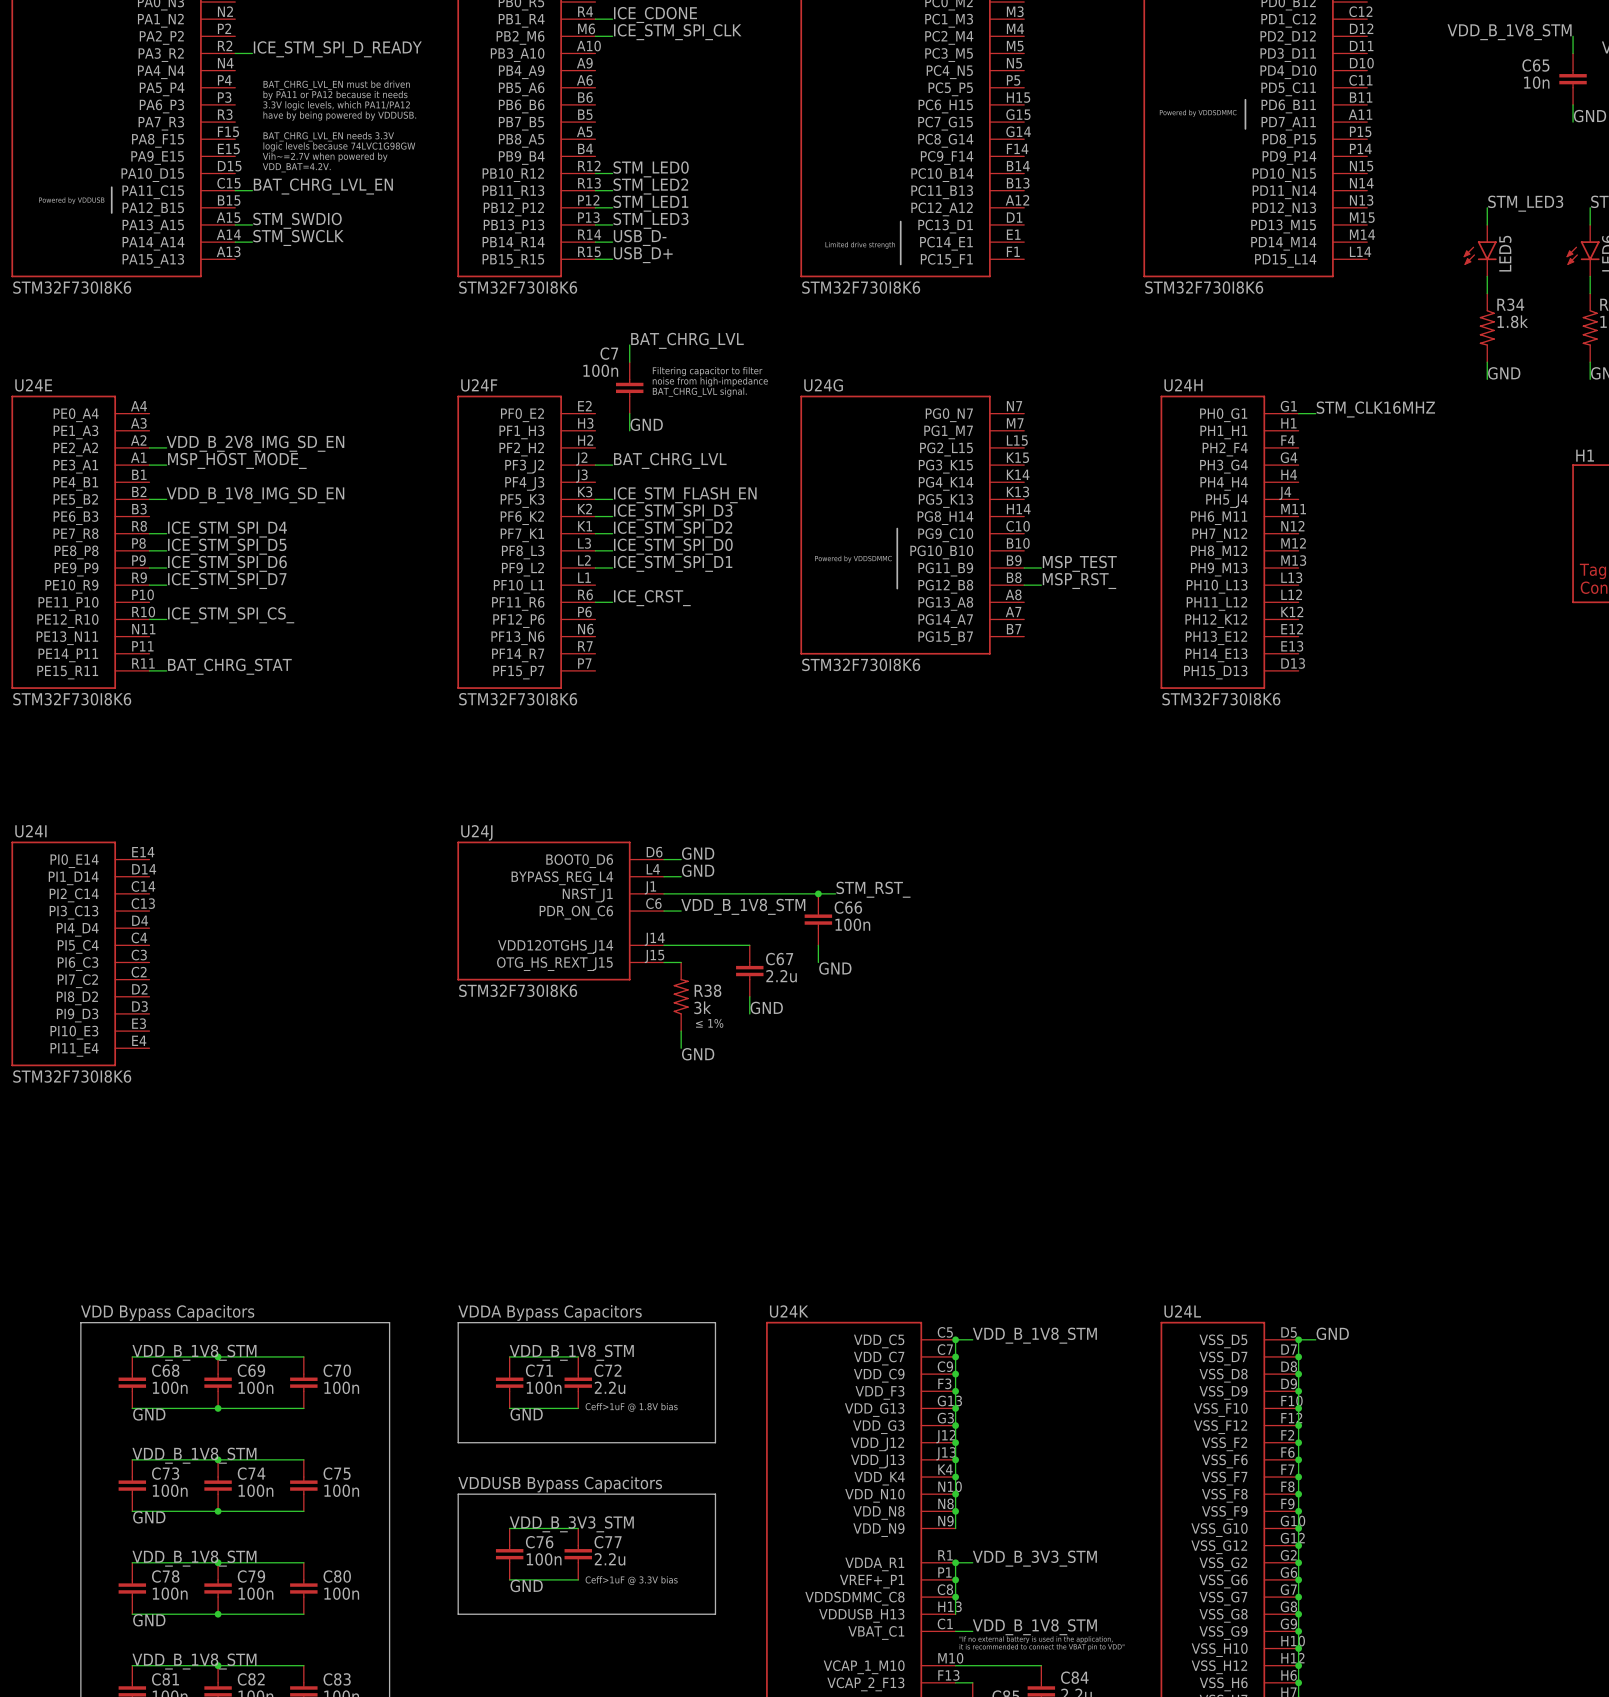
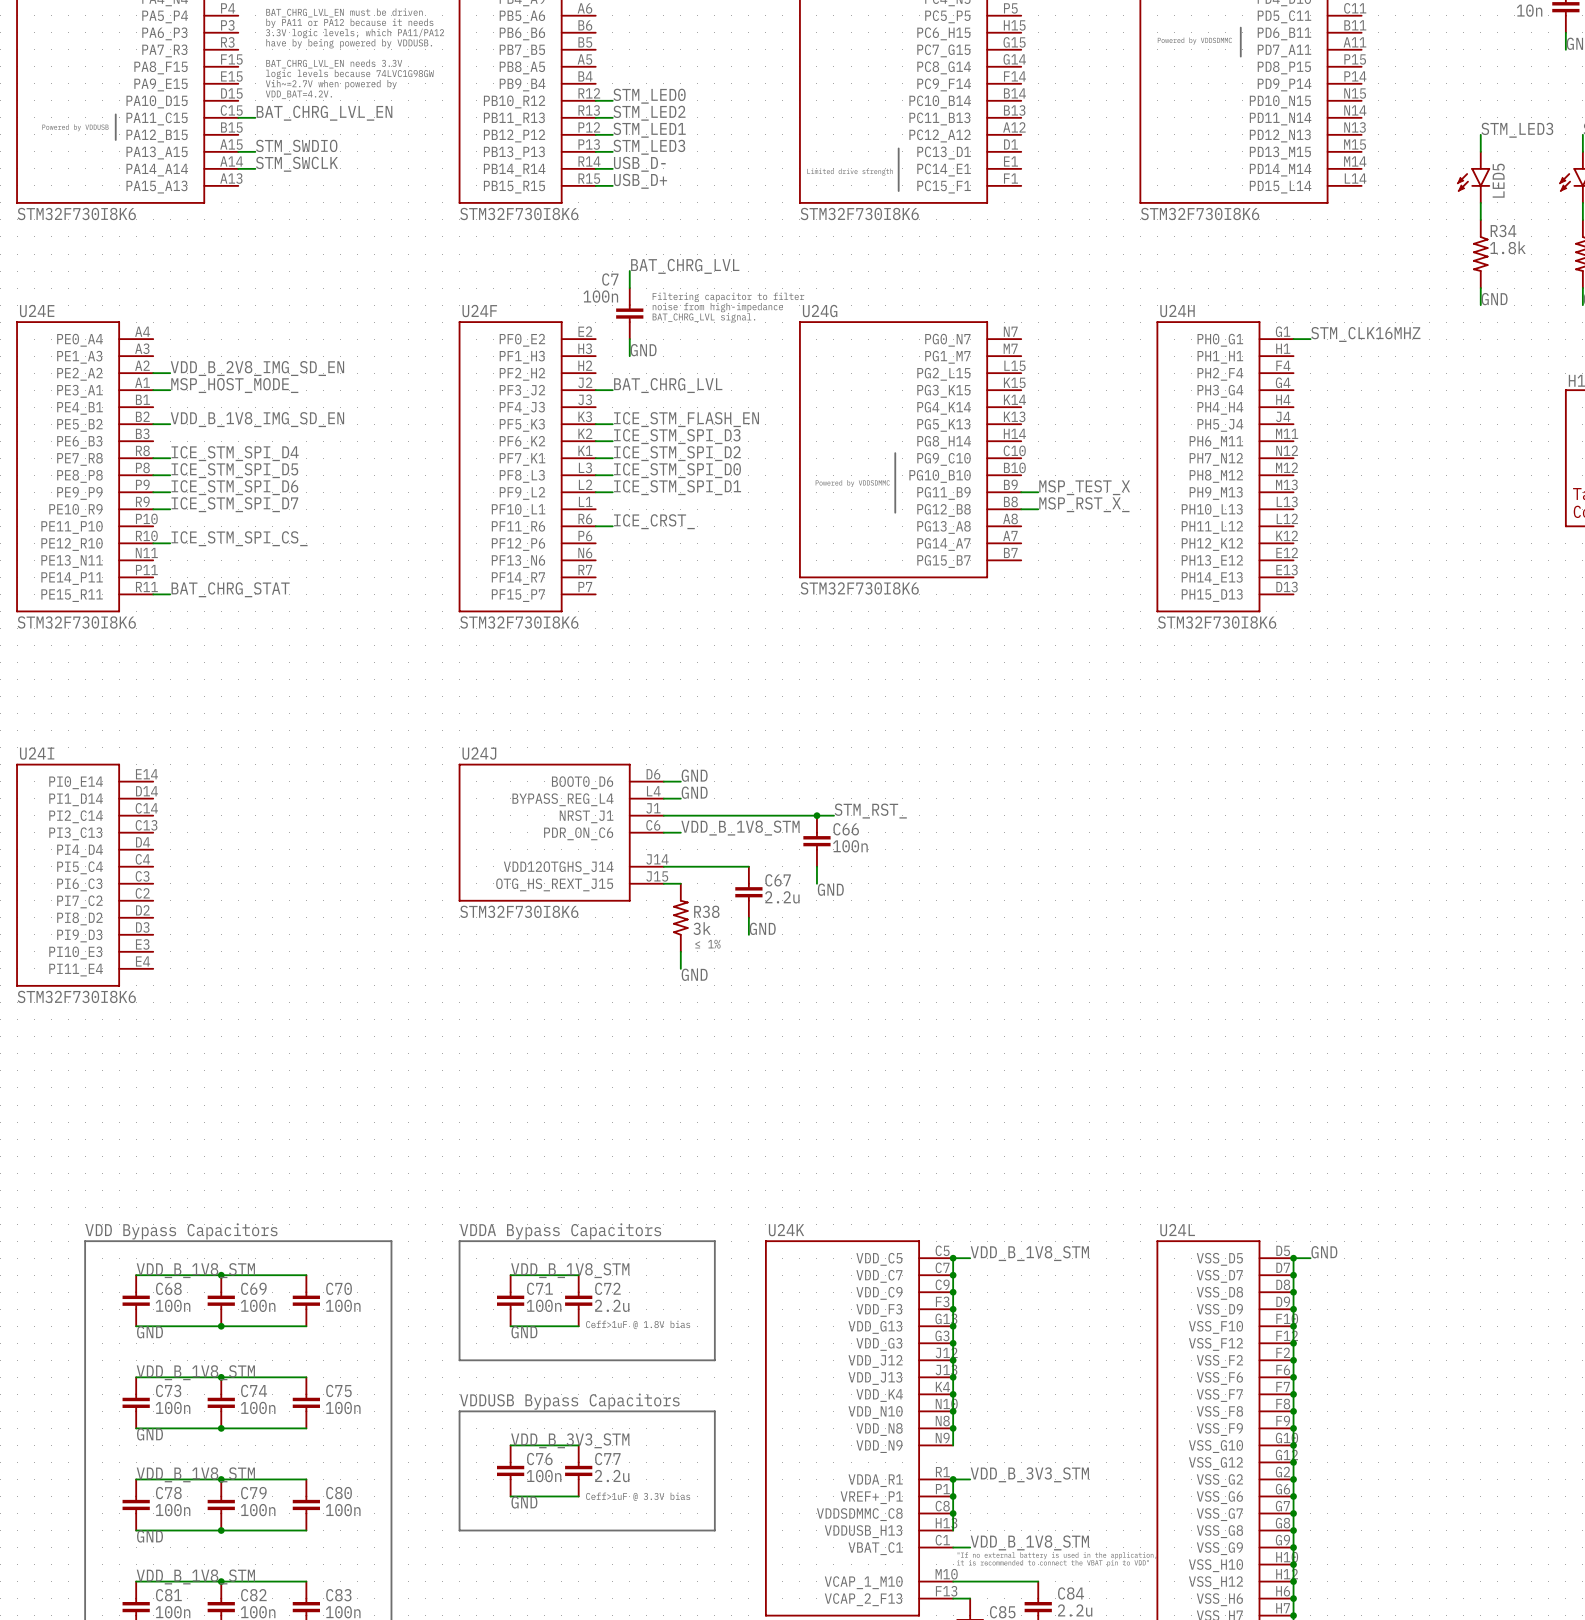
label: MSP_TEST (1079, 563) -> MSP_TEST_X (1084, 487)
label: MSP_RST_ (1079, 580) -> MSP_RST_X_ (1084, 504)

